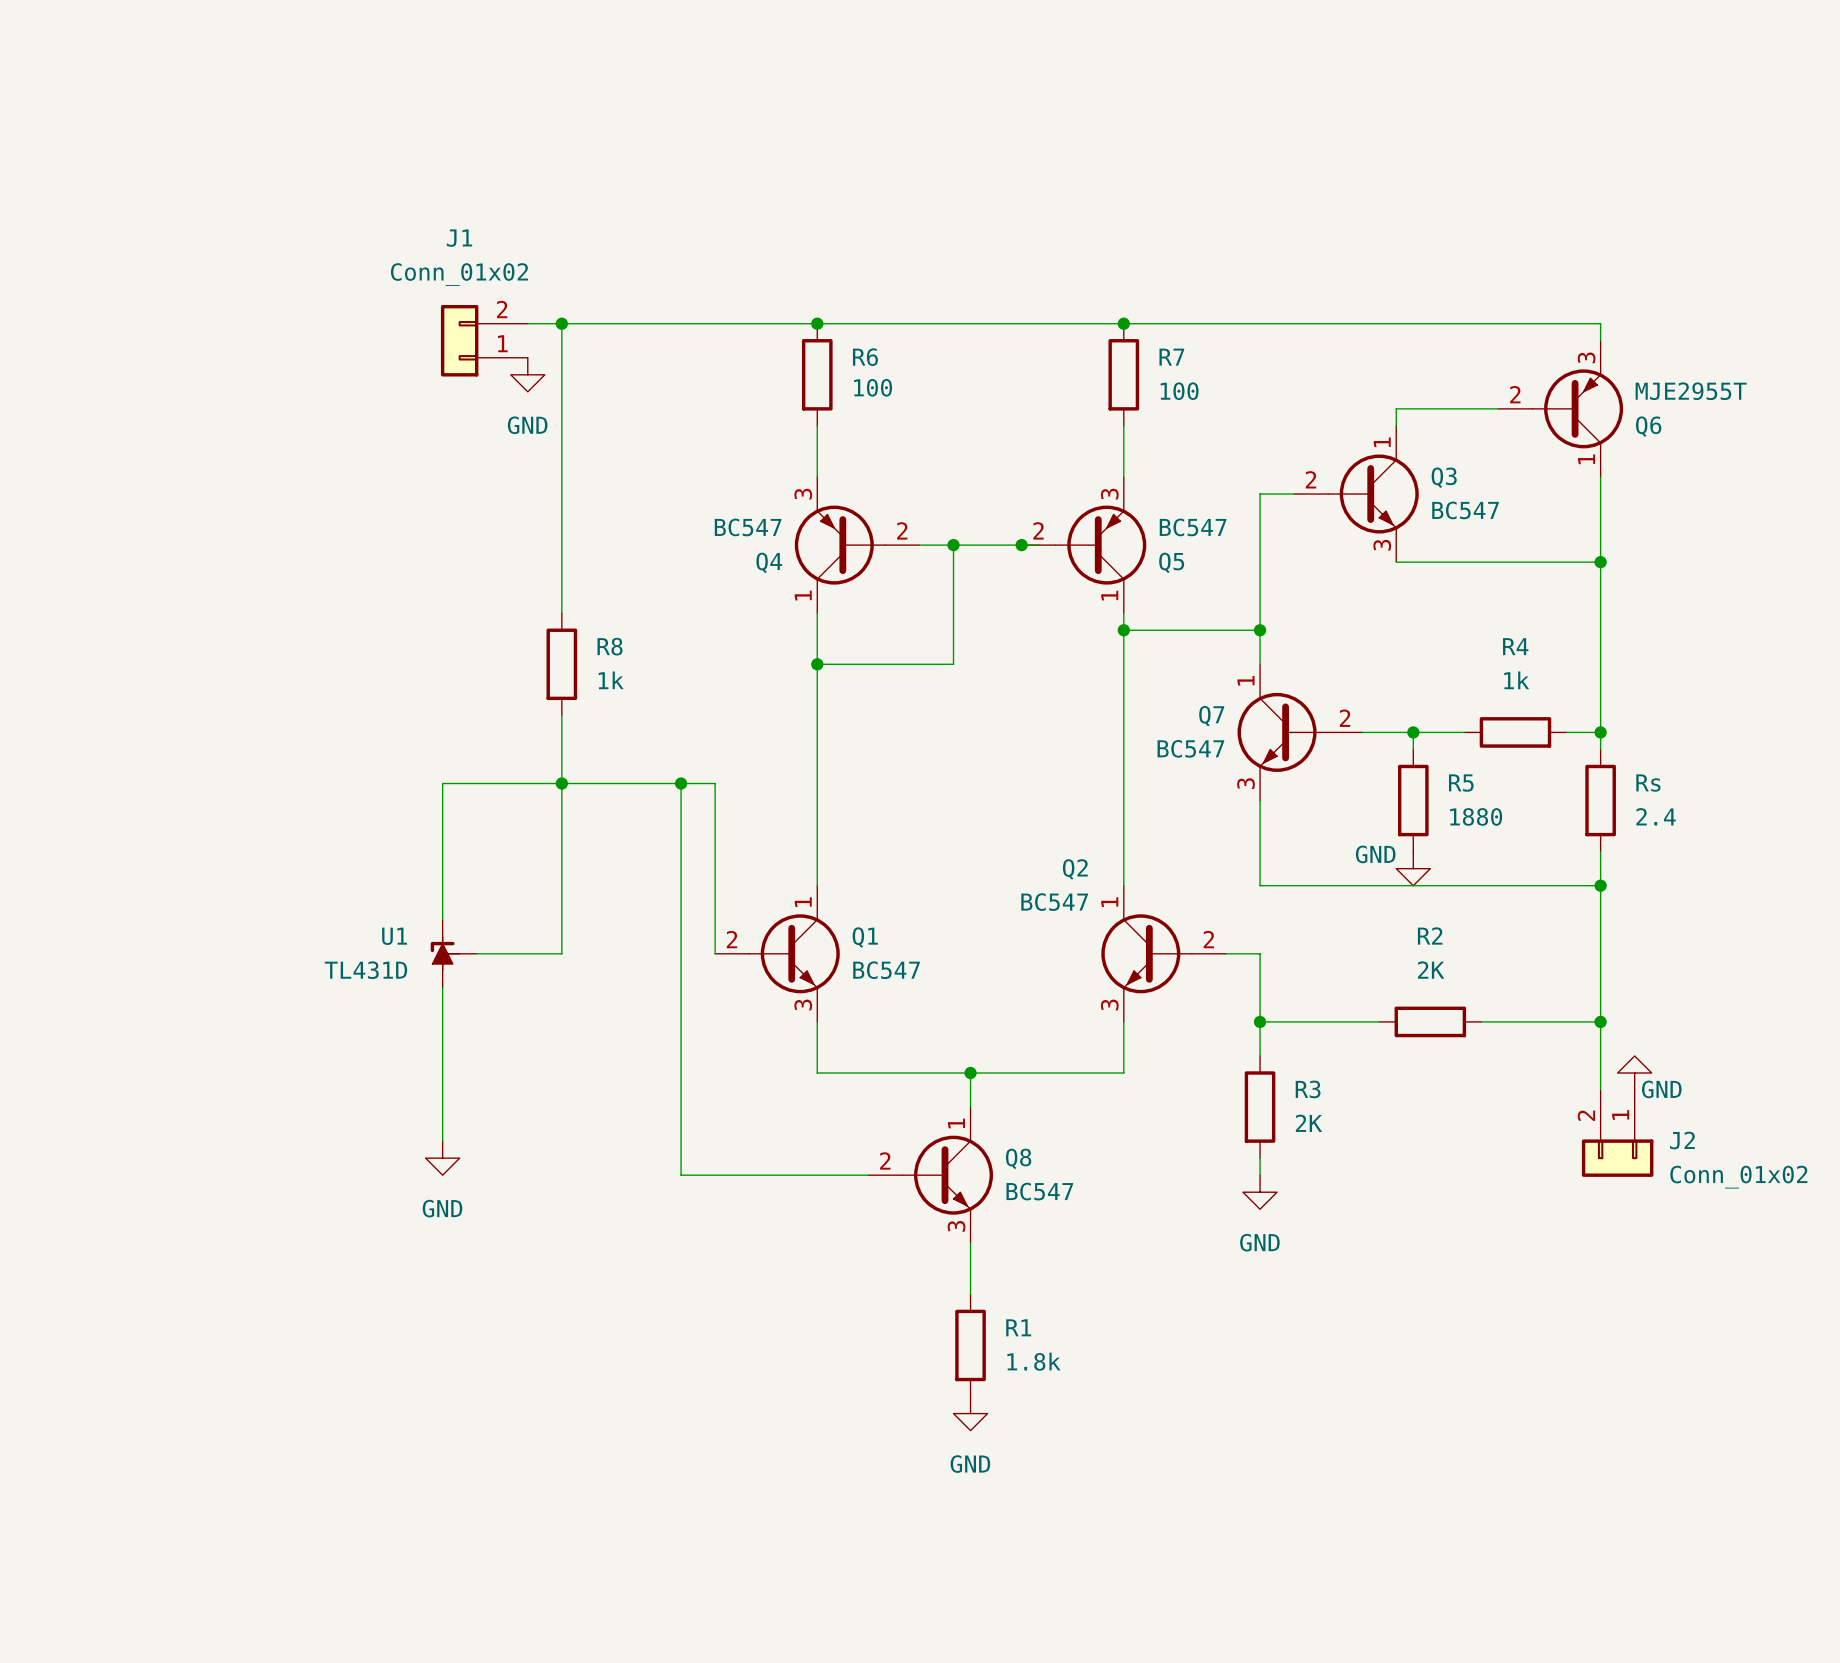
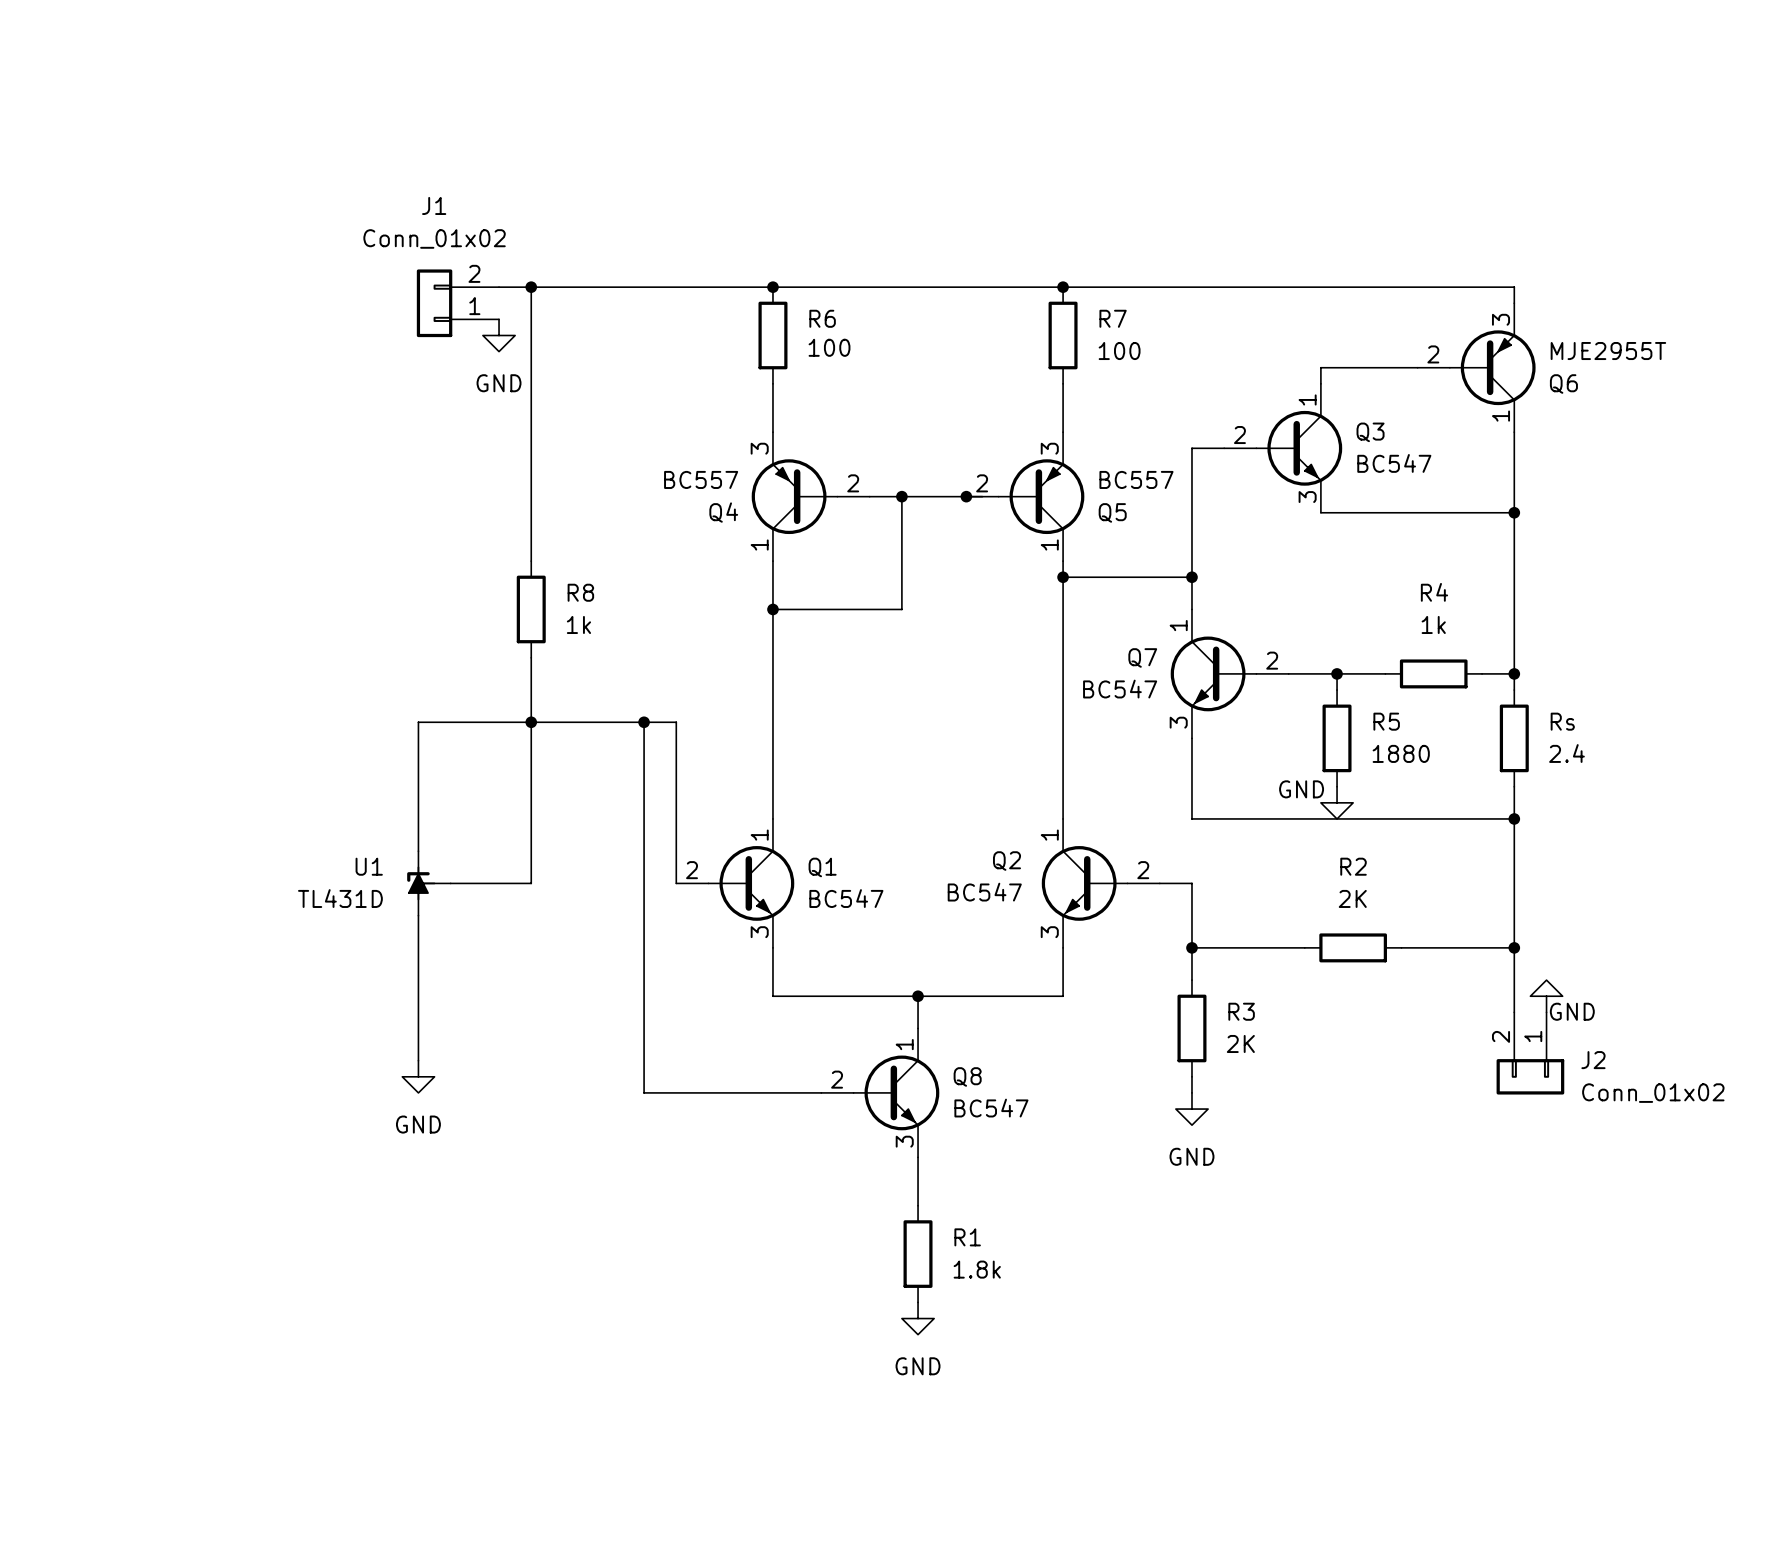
Q4 value: BC547 (748, 527) -> BC557 (701, 479)
Q5 value: BC547 (1193, 527) -> BC557 (1136, 479)
Q2 name position: Q2 (1075, 869) -> Q2 (1007, 861)
Q2 value position: BC547 (1054, 902) -> BC547 (984, 892)

